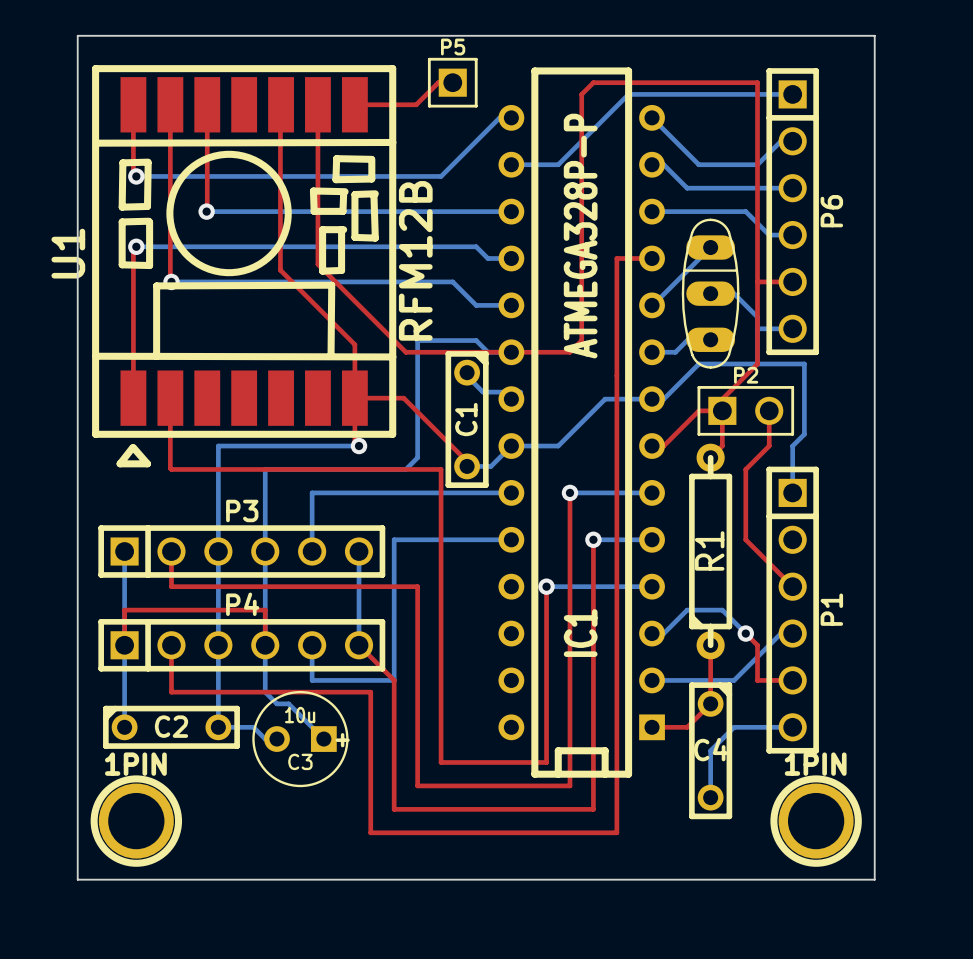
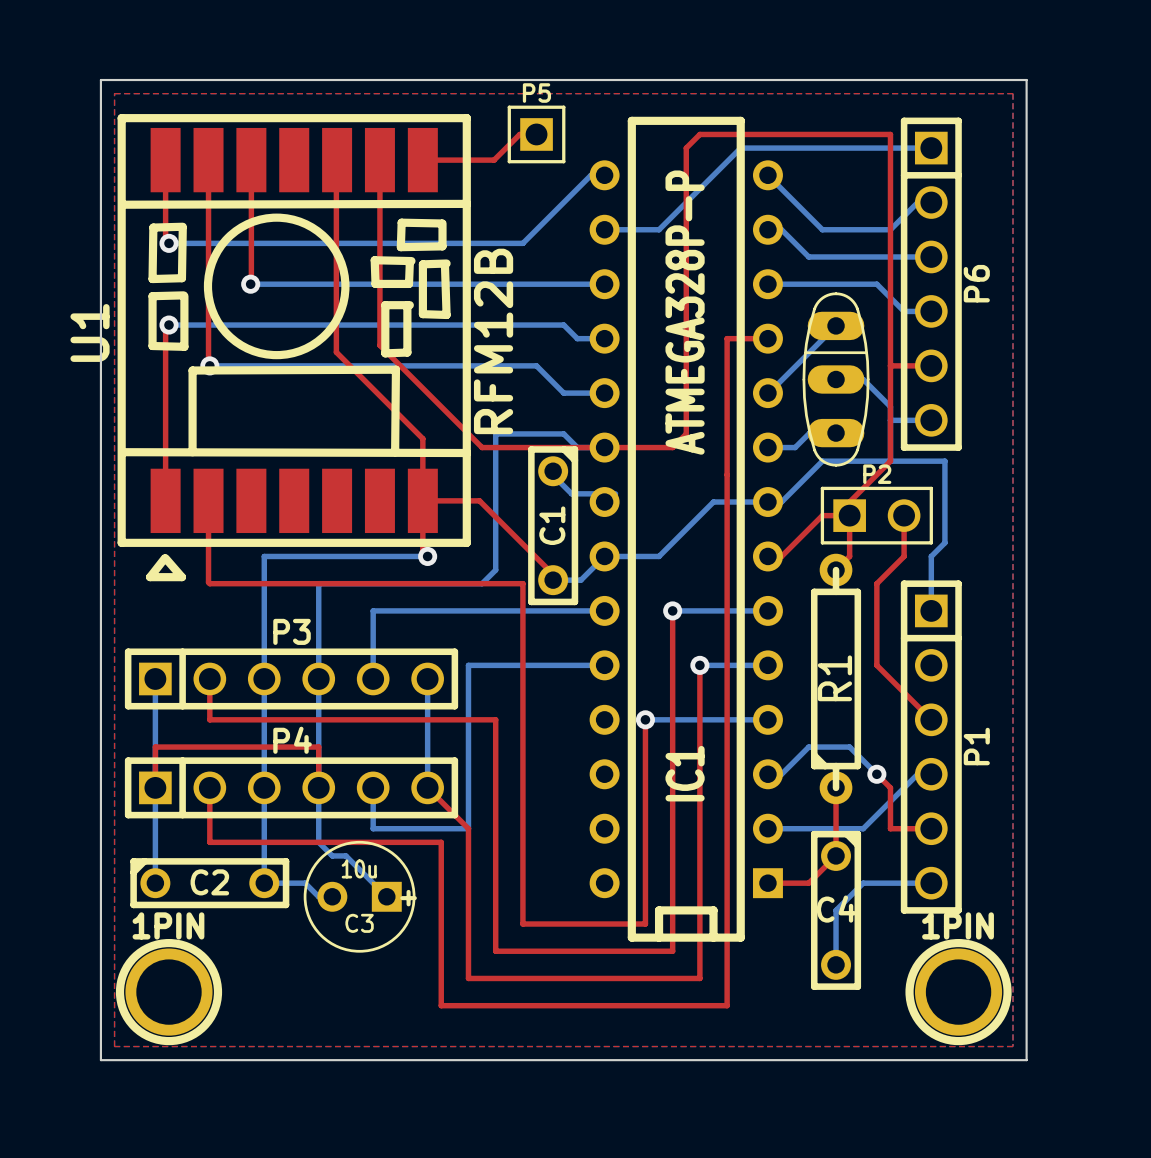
top zone outline: none -> (114, 93) (114, 1046) (1012, 1046) (1012, 93) (114, 93)

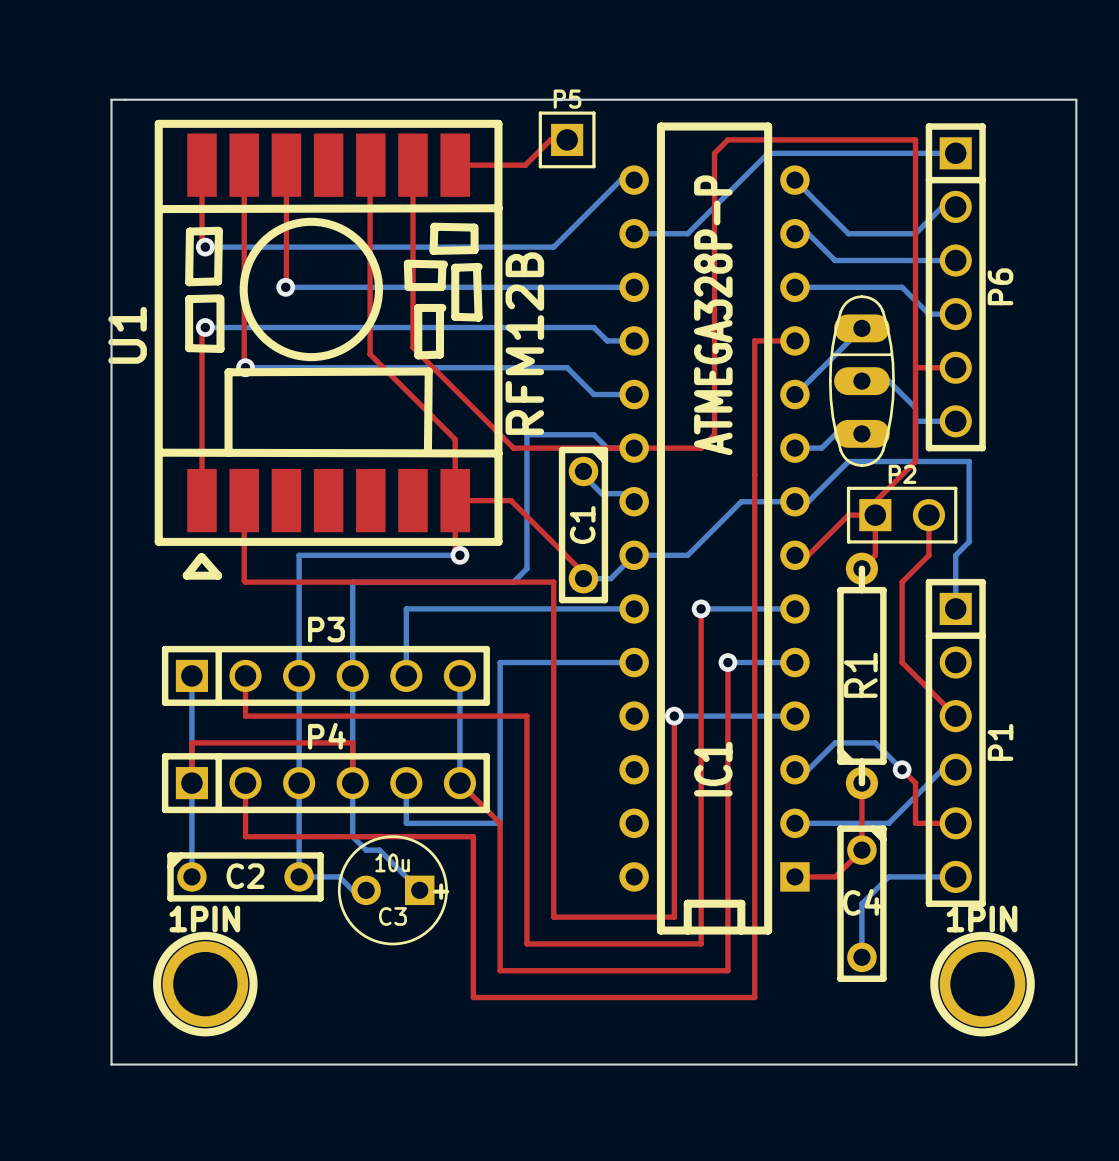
board edge: (100, 80) (100, 1060) (1026, 1060) (1026, 80) (100, 80) -> (111, 99) (111, 1064) (1076, 1064) (1076, 99) (111, 99)
top zone outline: (114, 93) (114, 1046) (1012, 1046) (1012, 93) (114, 93) -> none

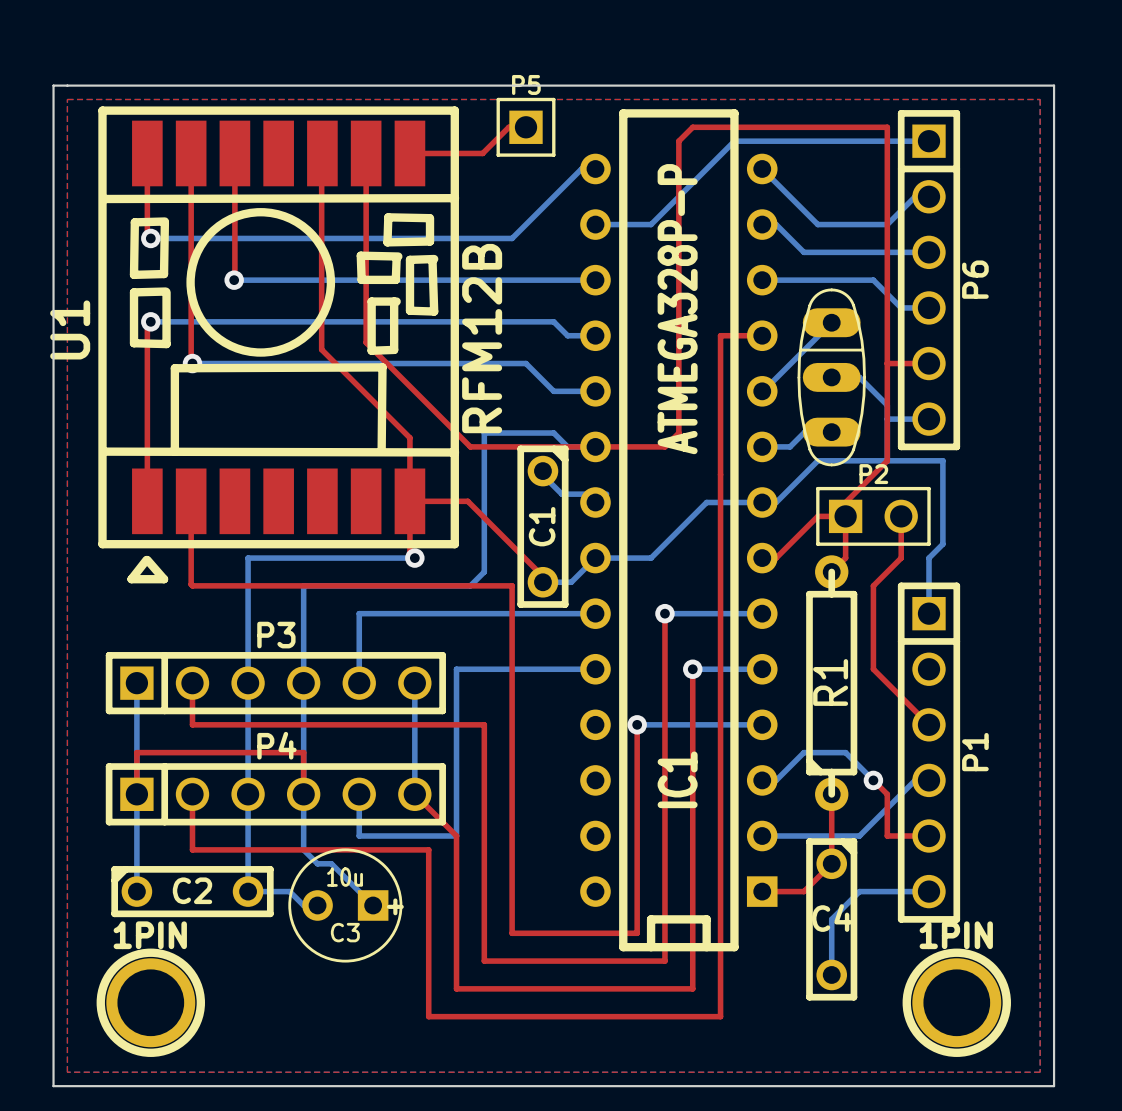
top zone outline: none -> (67, 99) (67, 1072) (1040, 1072) (1040, 99) (67, 99)

